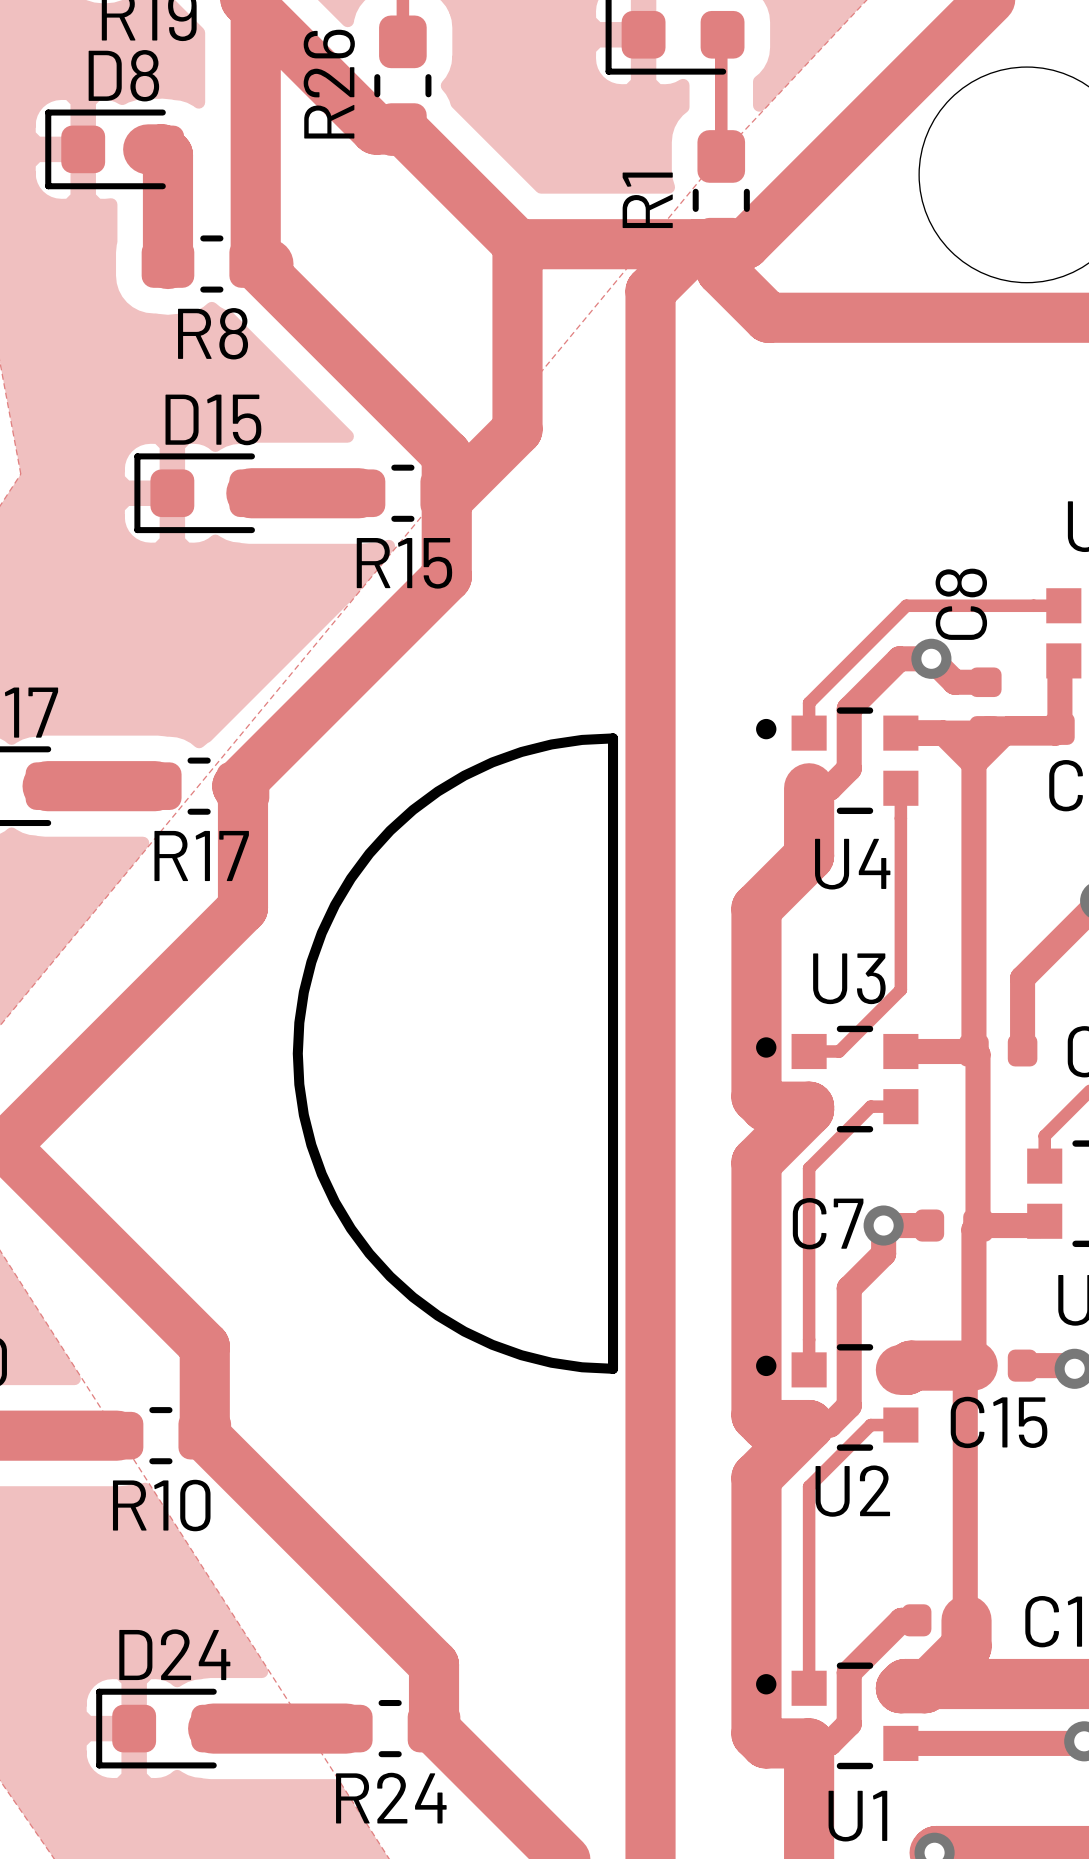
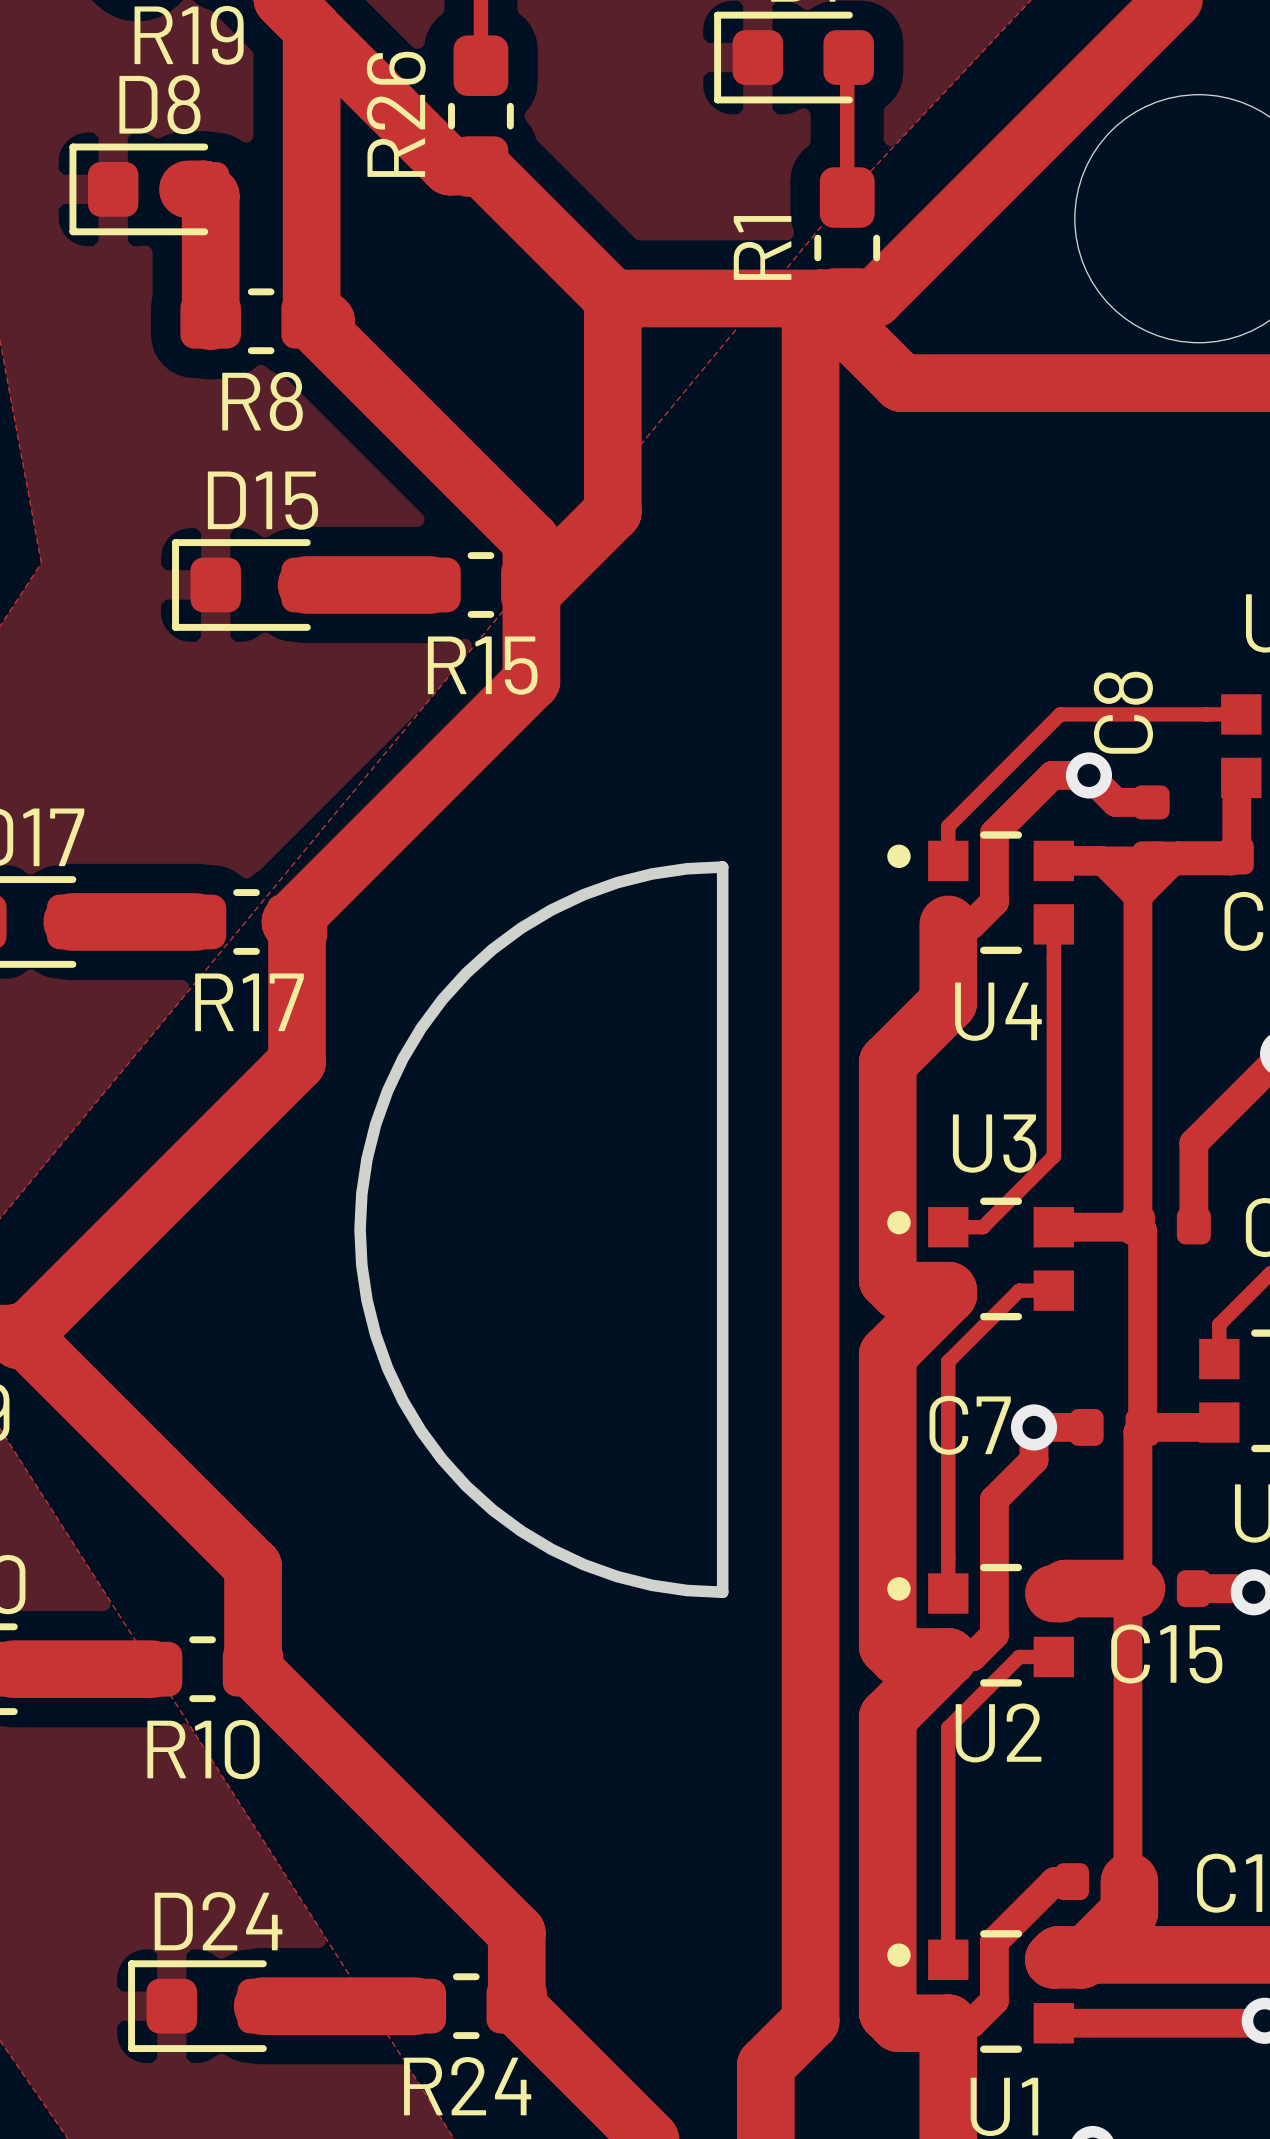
track: (689, 252) (650, 291) (650, 1780) -> (810, 307) (810, 2020) (765, 2065)

